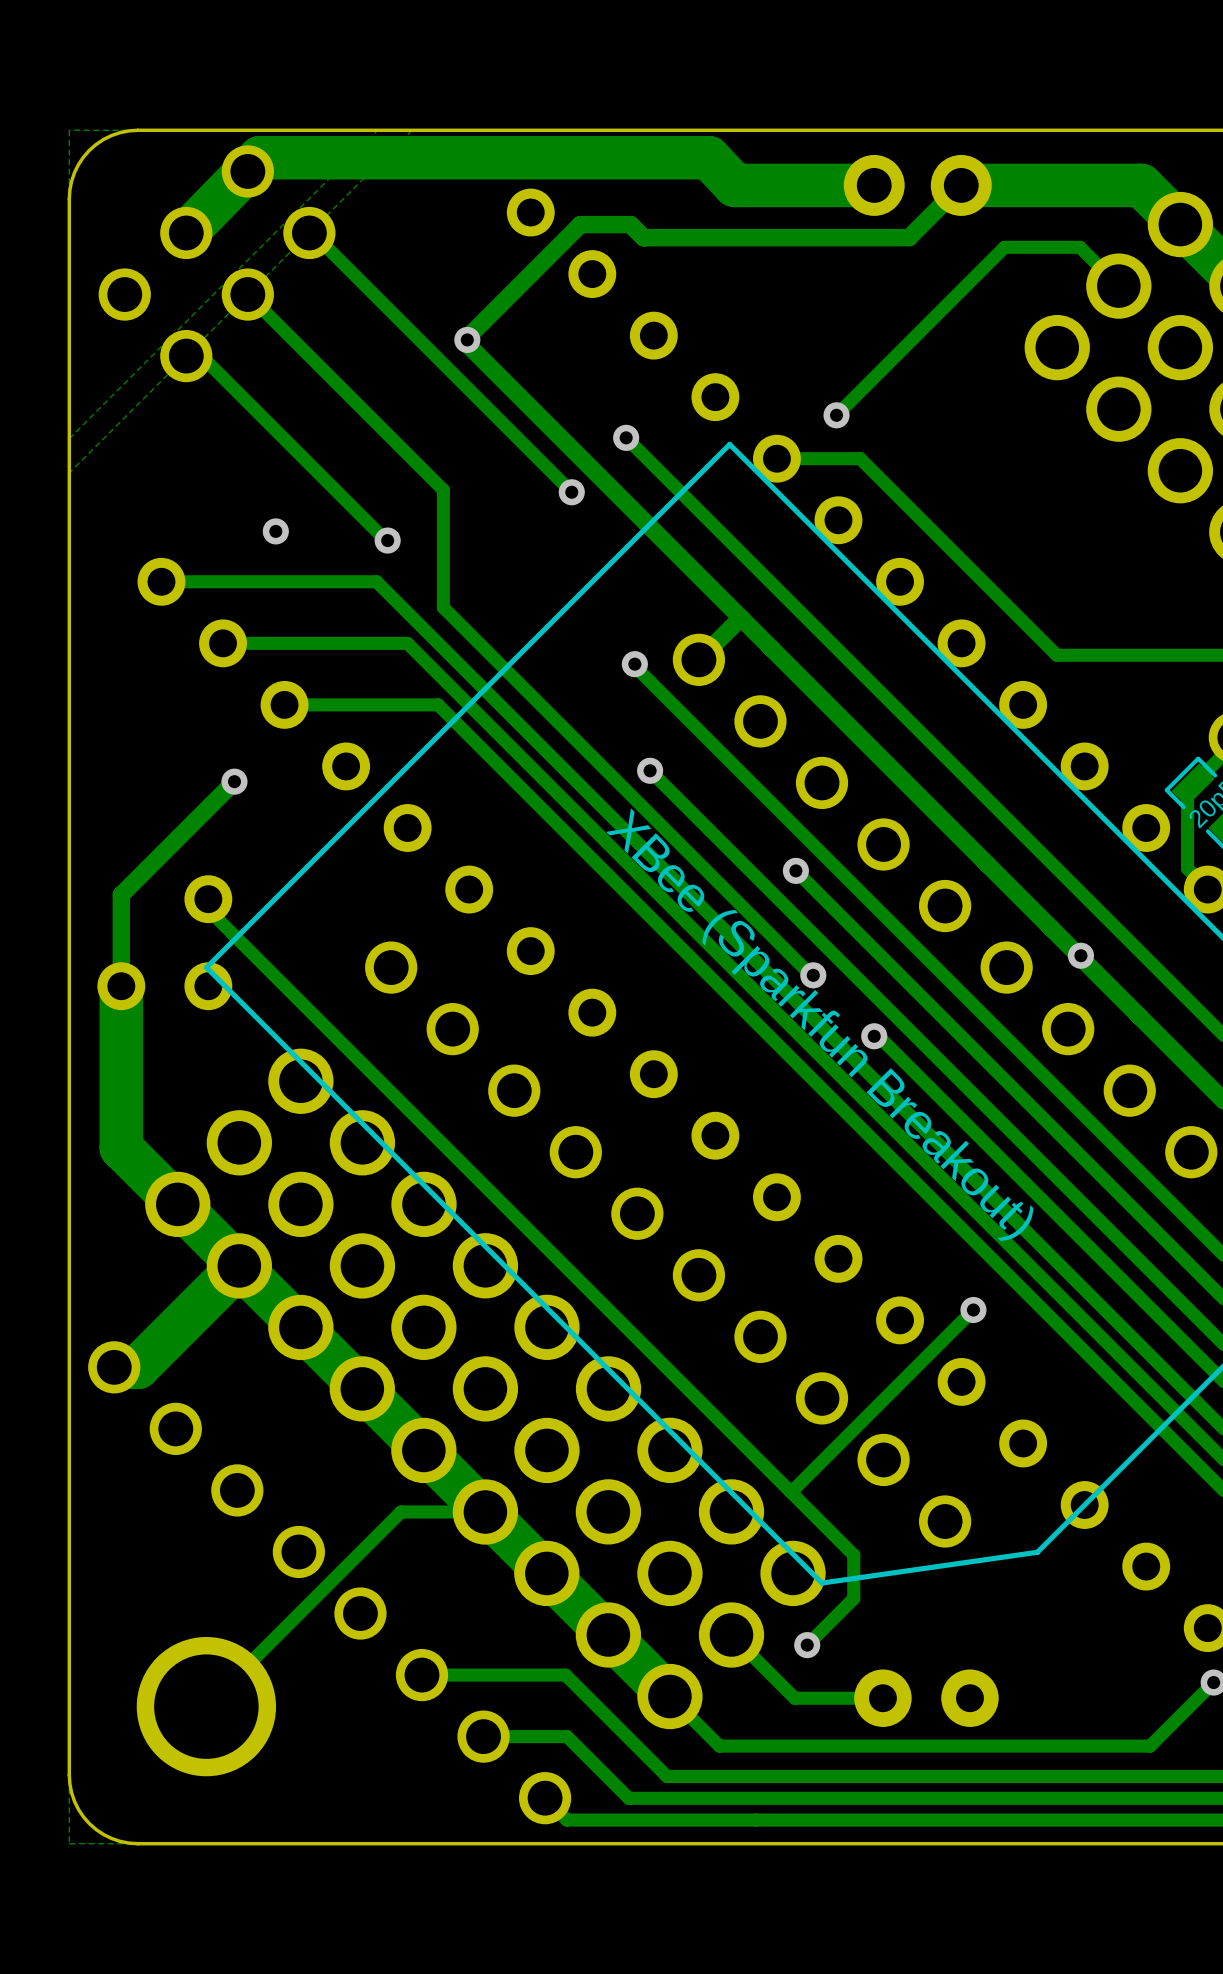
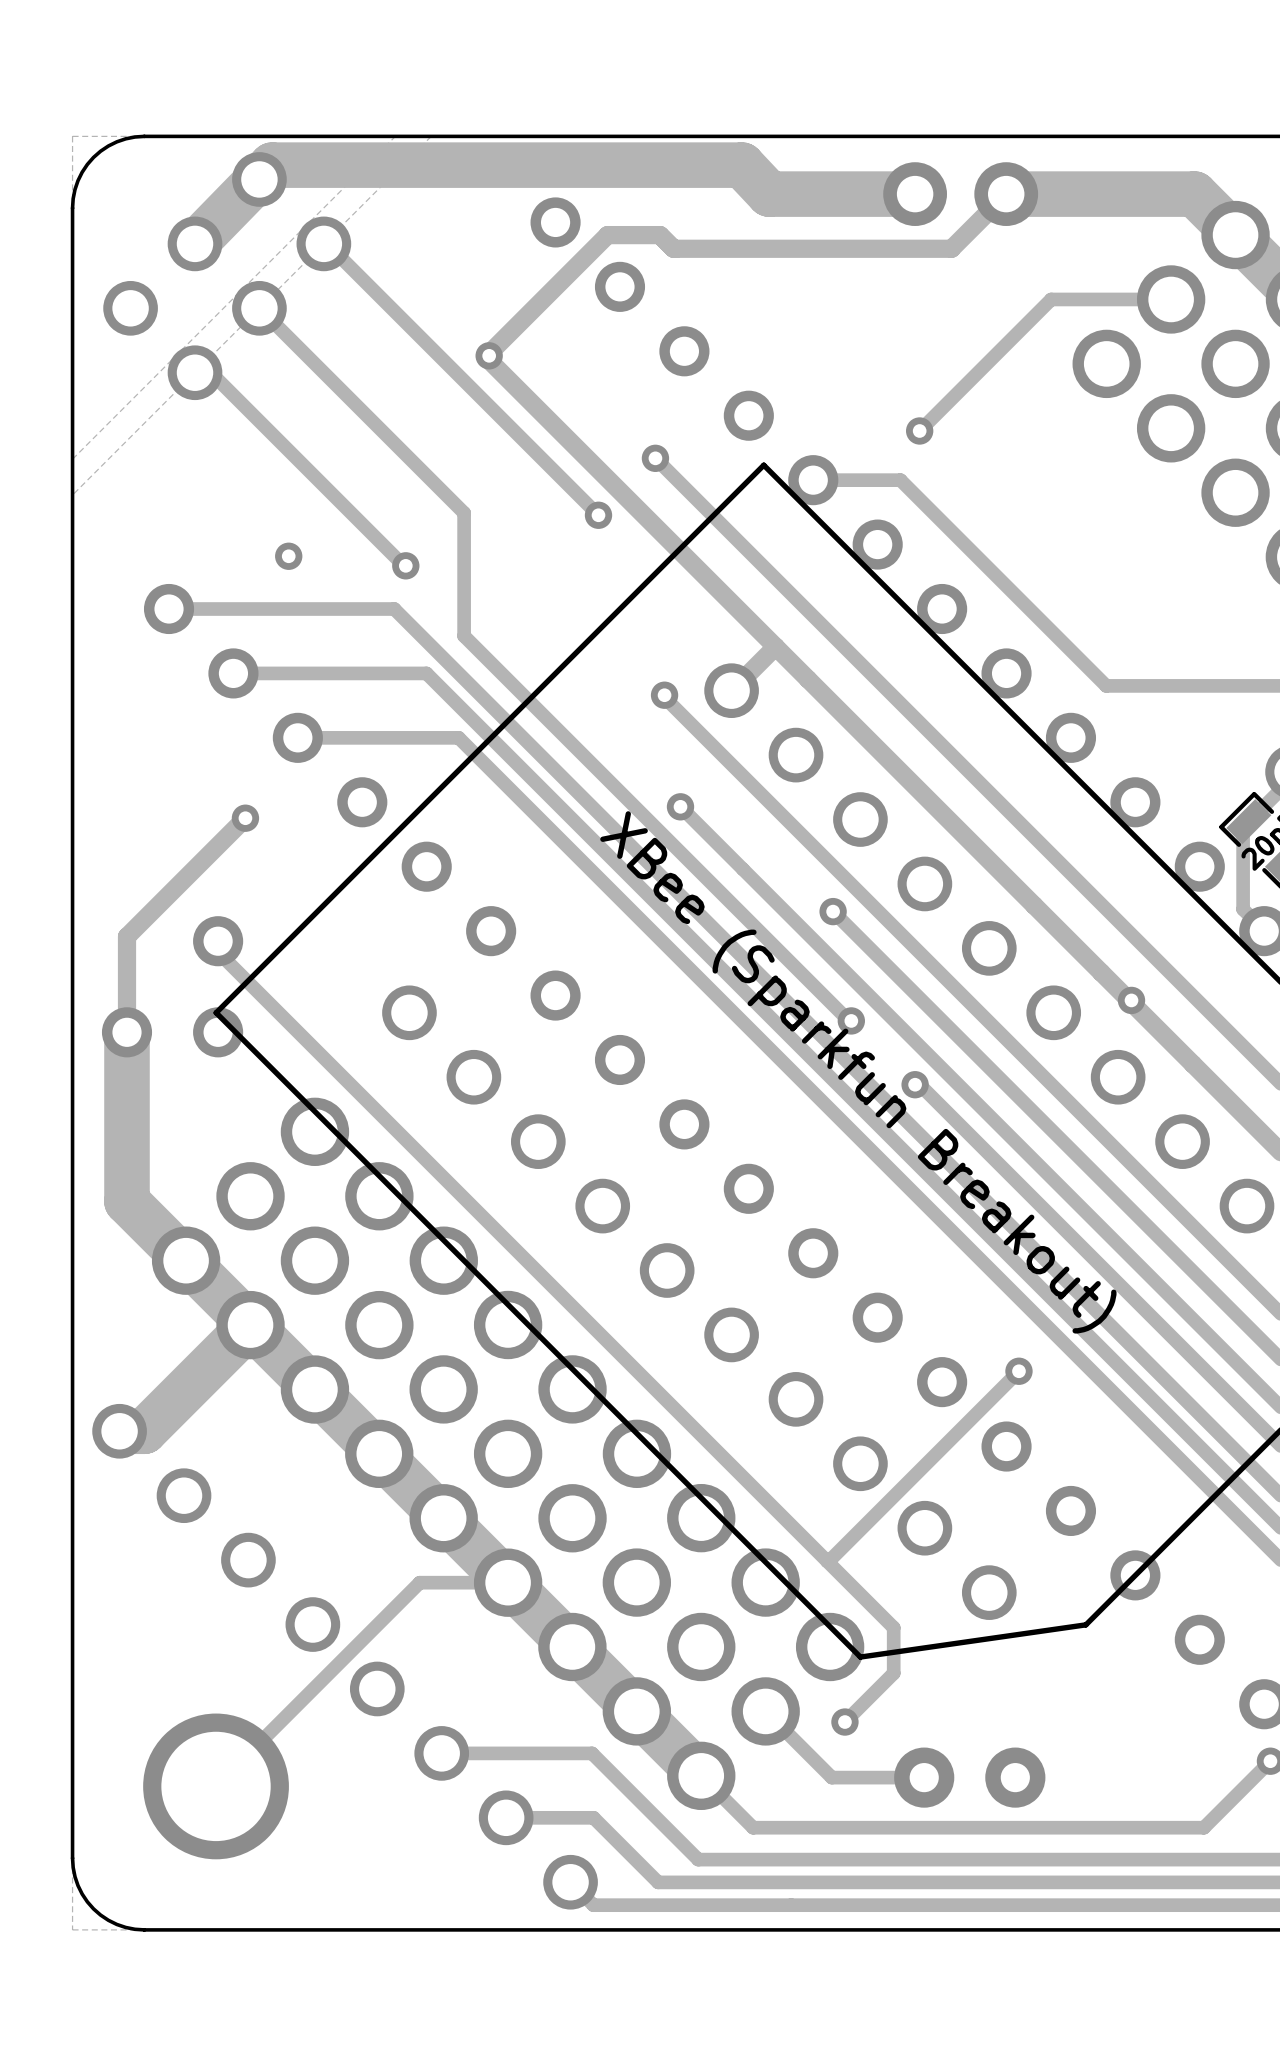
track: (1118, 286) (1080, 247) (1004, 247) (836, 415) -> (1171, 299) (1051, 299) (919, 430)
via position: (836, 415) -> (919, 430)

